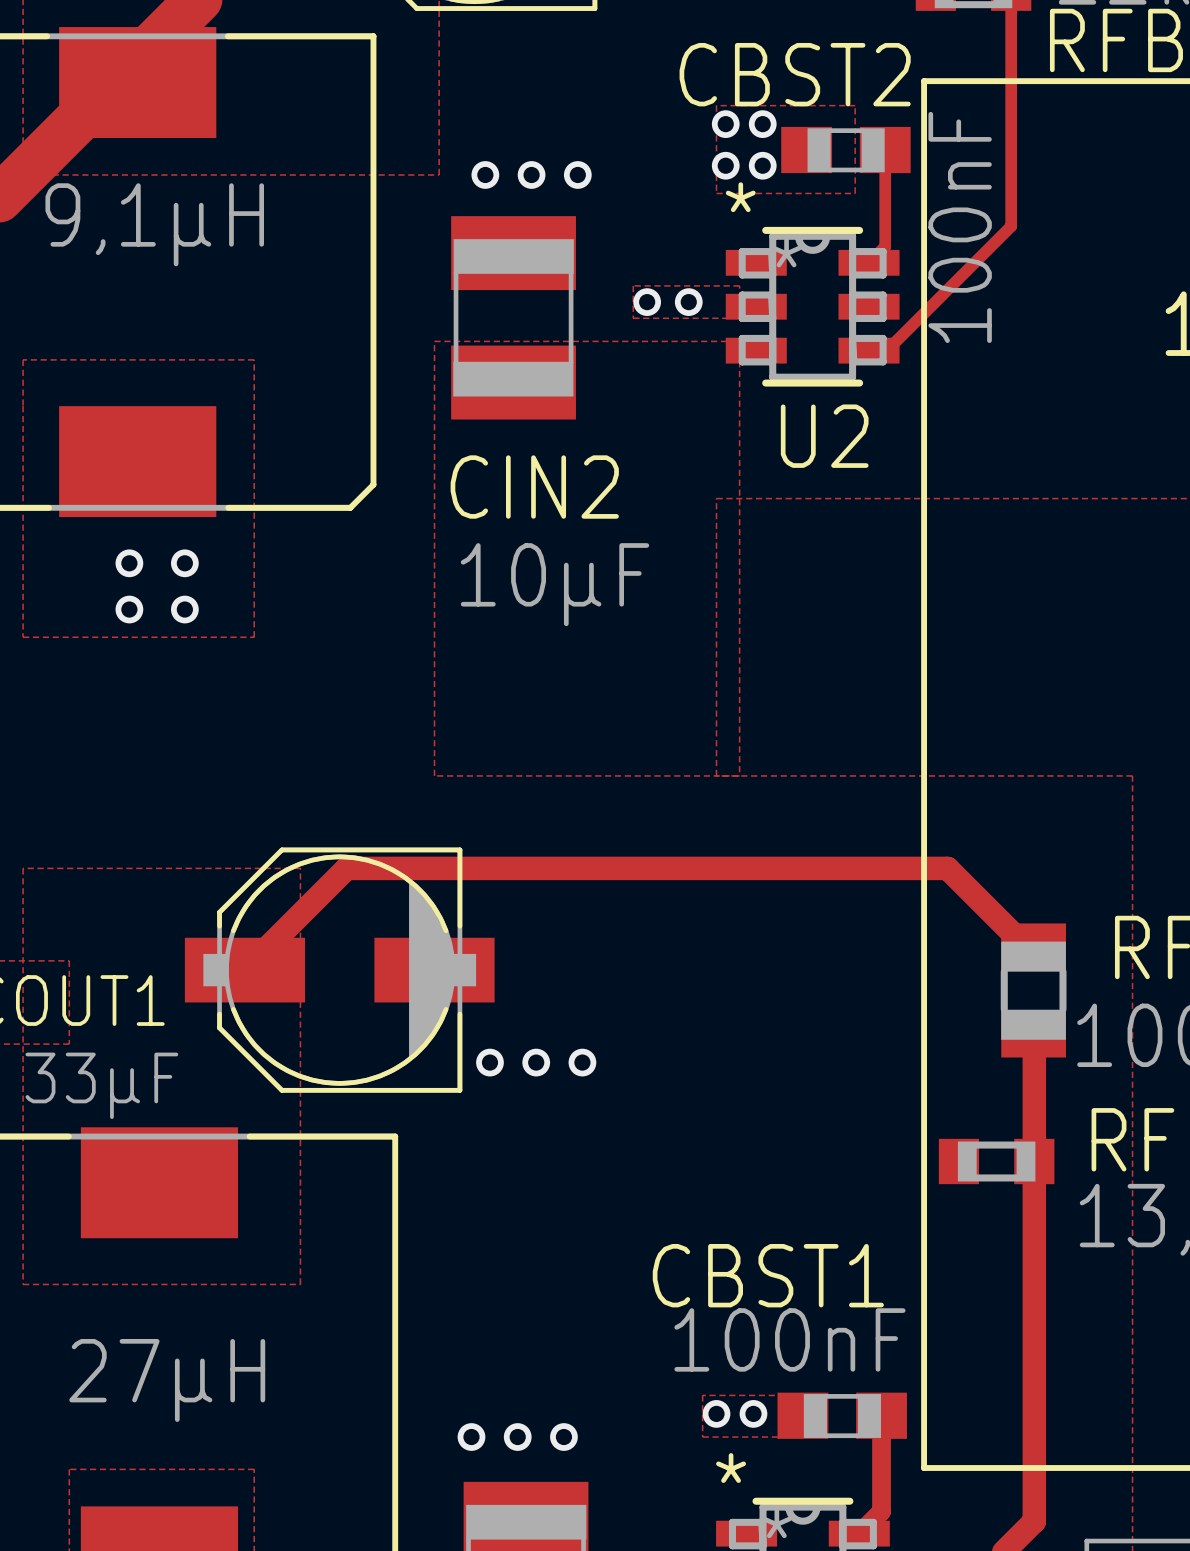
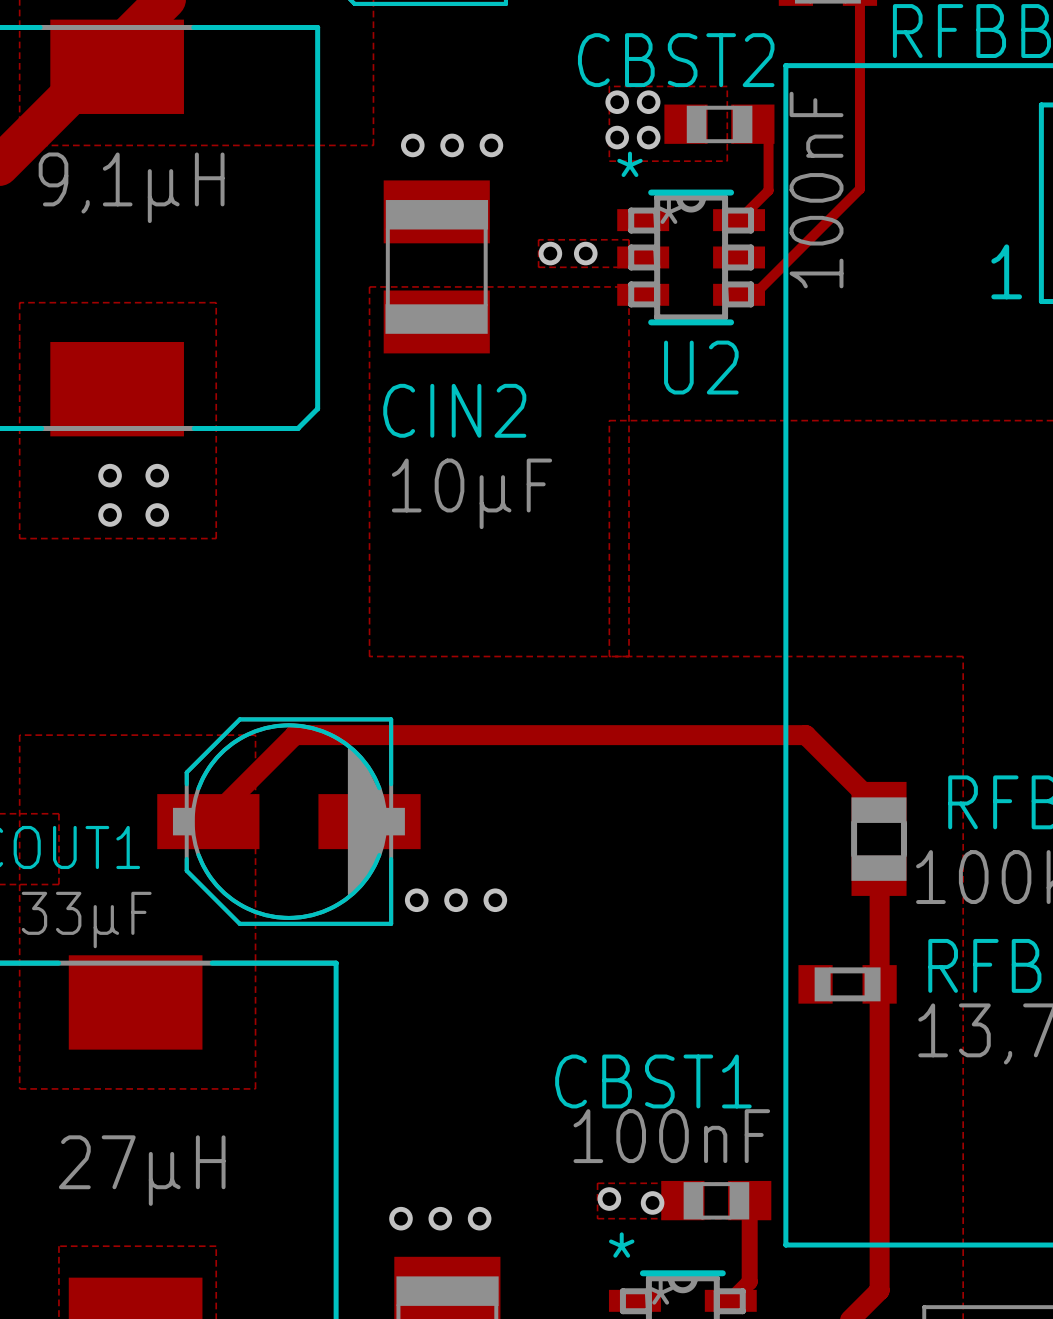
track: (885, 150) (885, 246) -> (768, 124) (768, 190) (752, 206)
via position: (753, 1413) -> (652, 1202)

